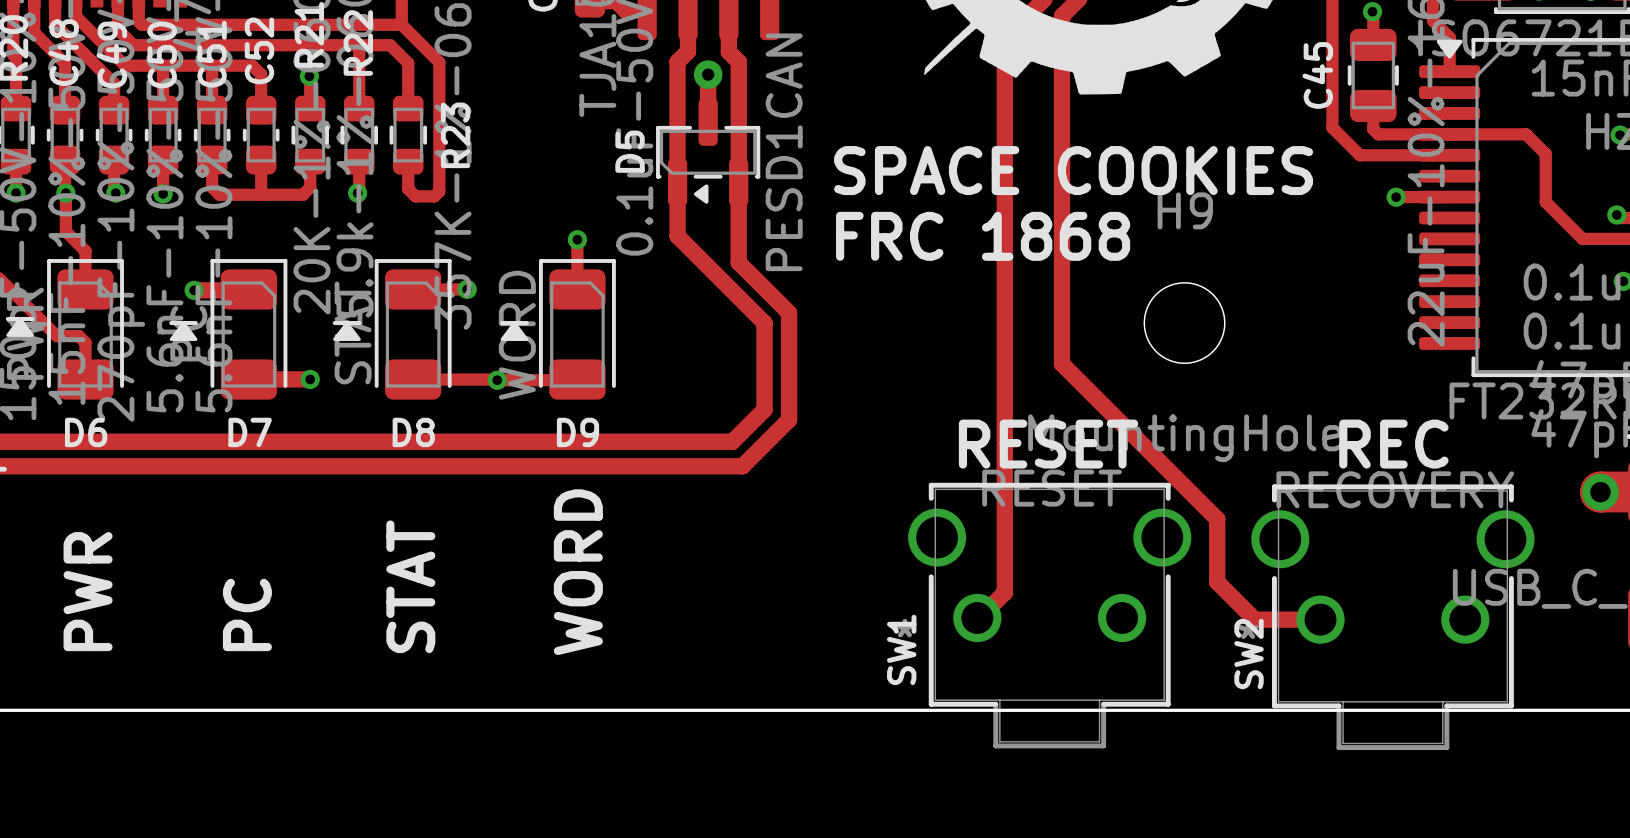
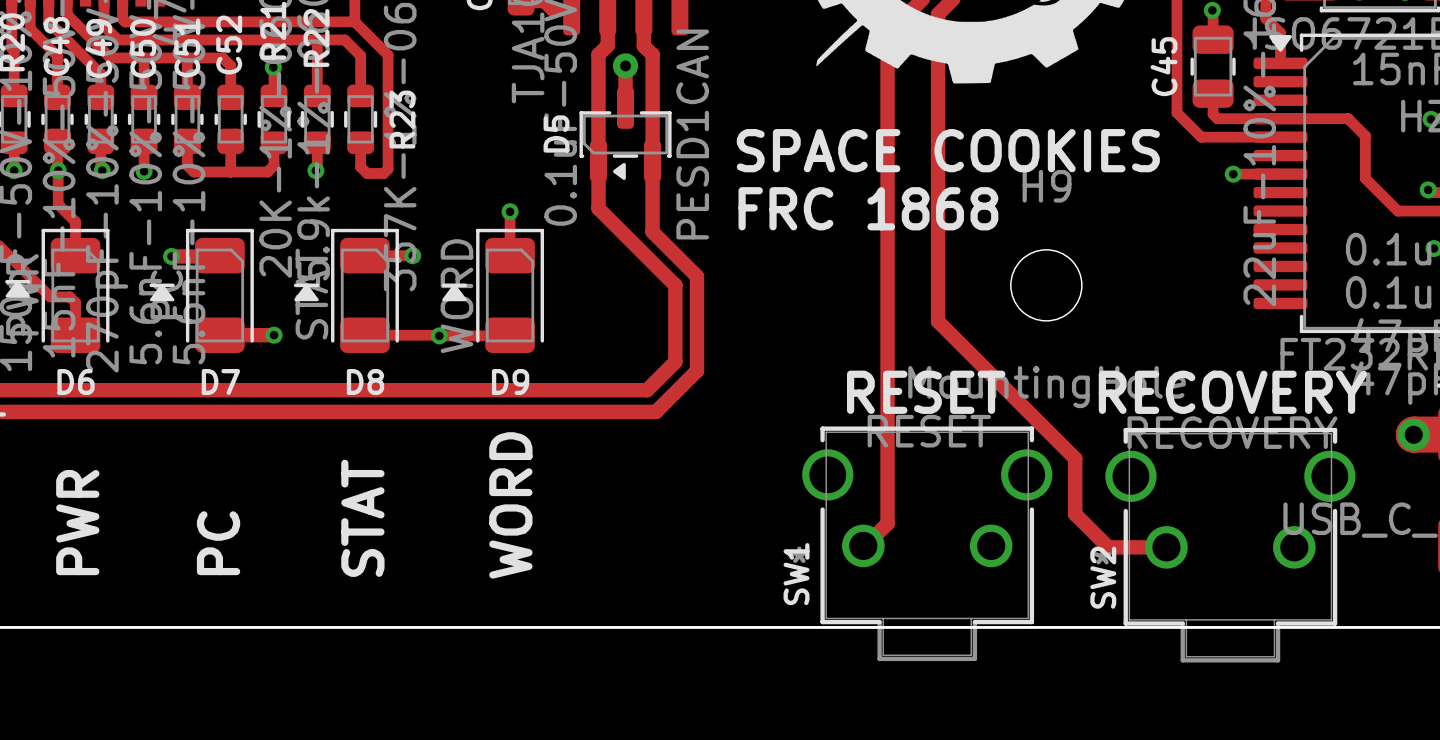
text: REC (1393, 444) -> RECOVERY (1232, 392)

